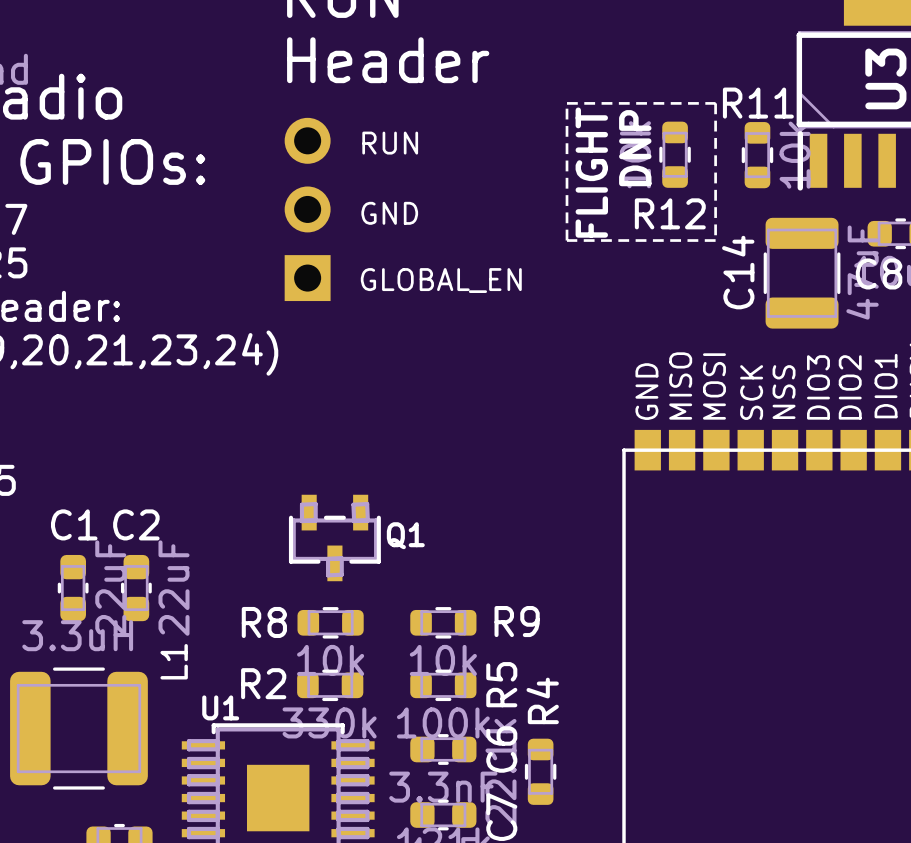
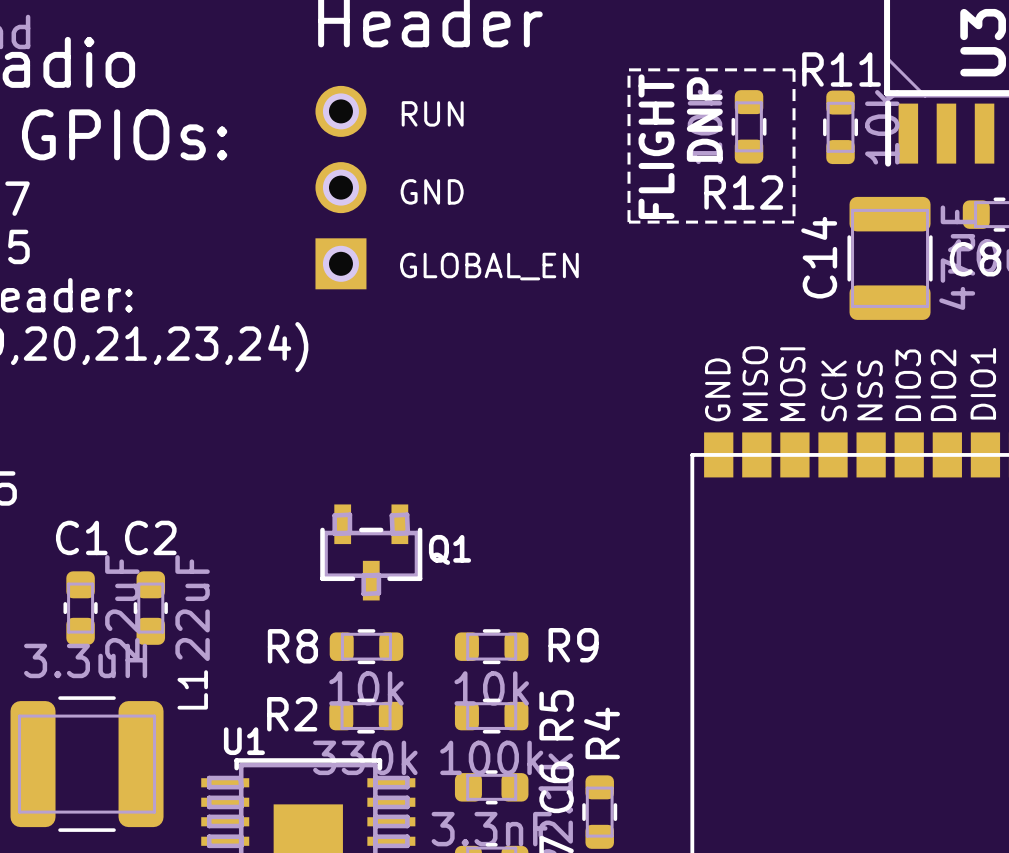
round board edge: none -> [322, 93, 359, 130]
round board edge: none -> [322, 169, 359, 206]
round board edge: none -> [322, 245, 359, 282]

